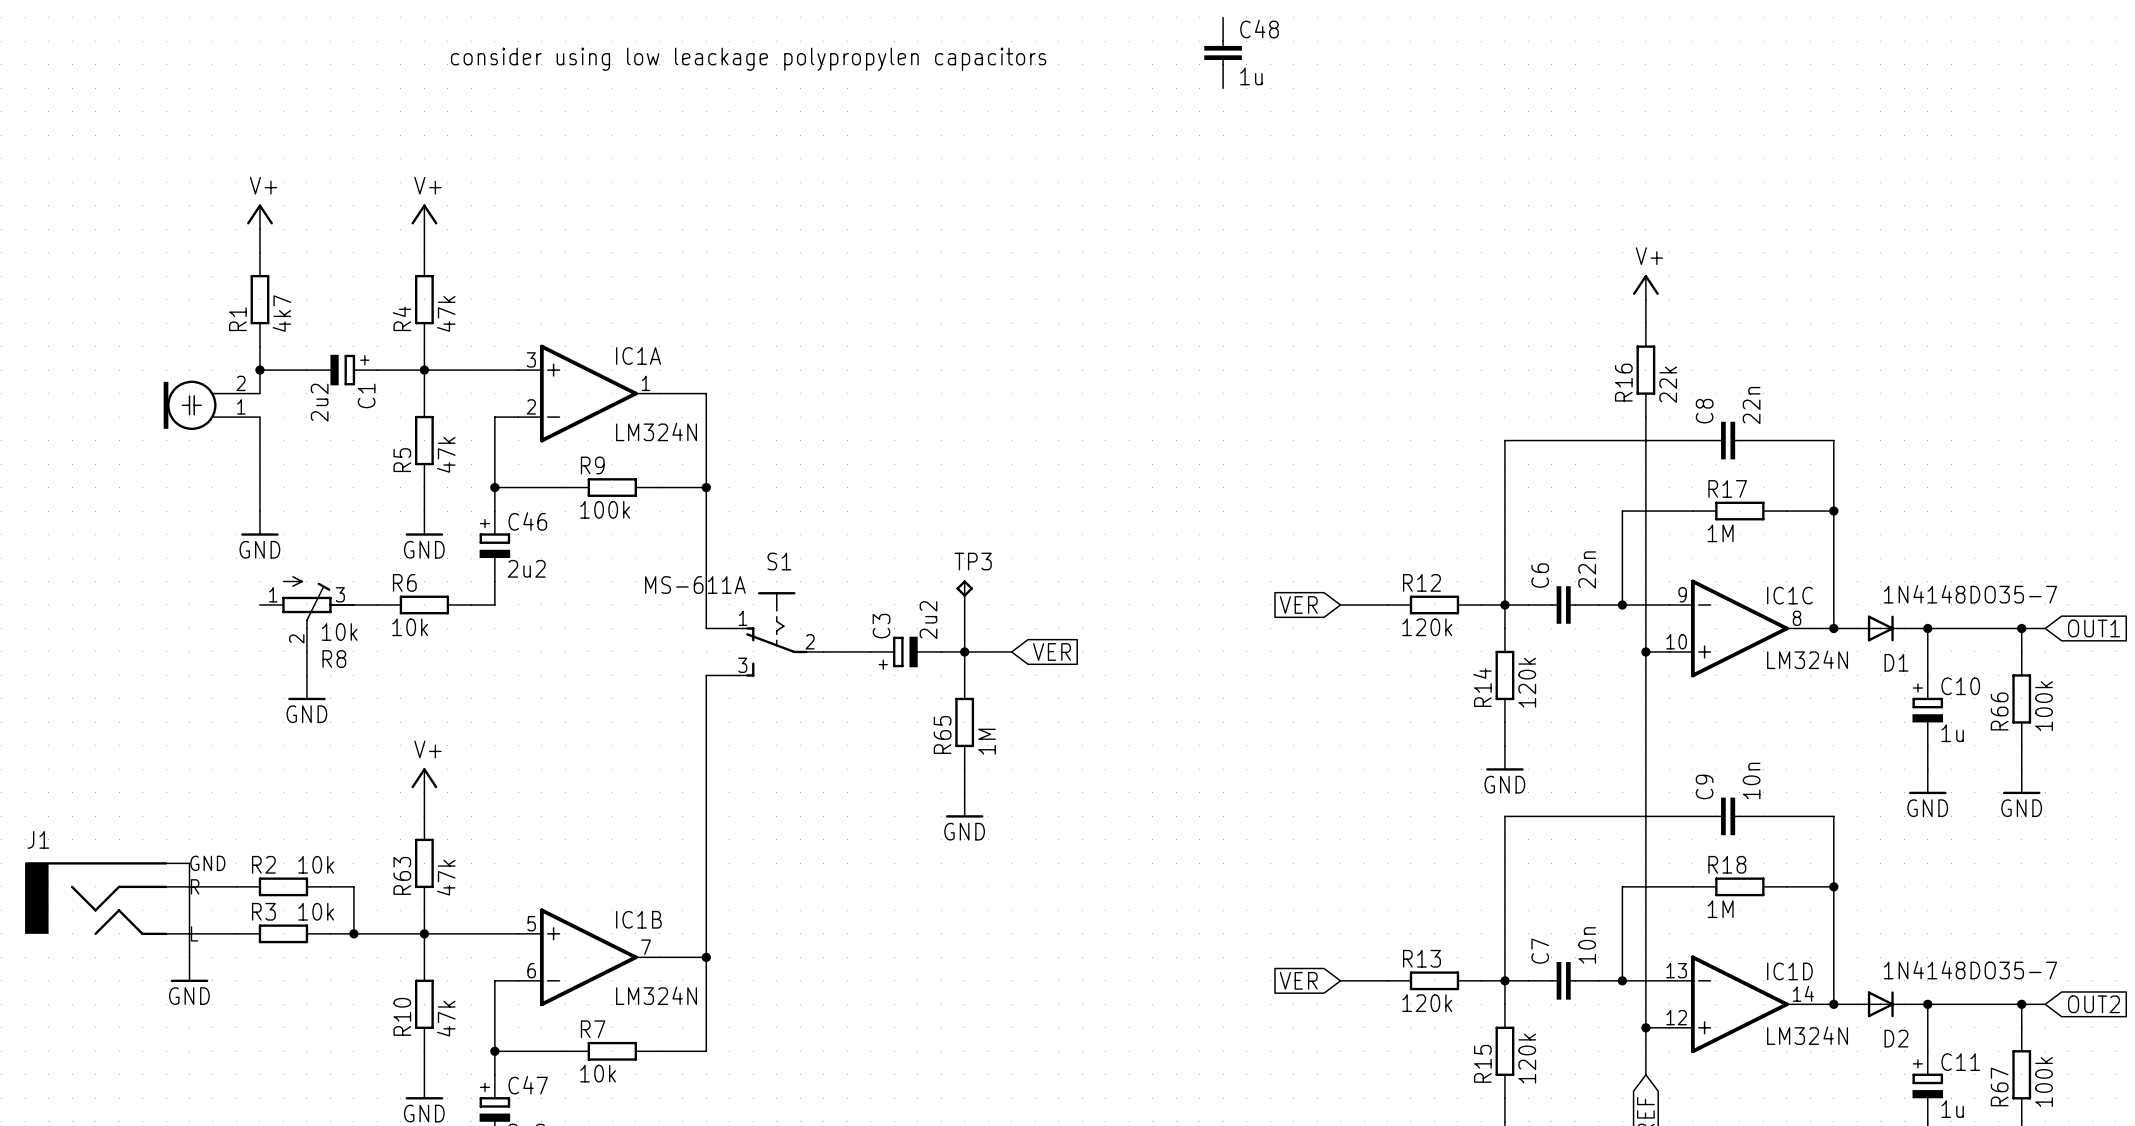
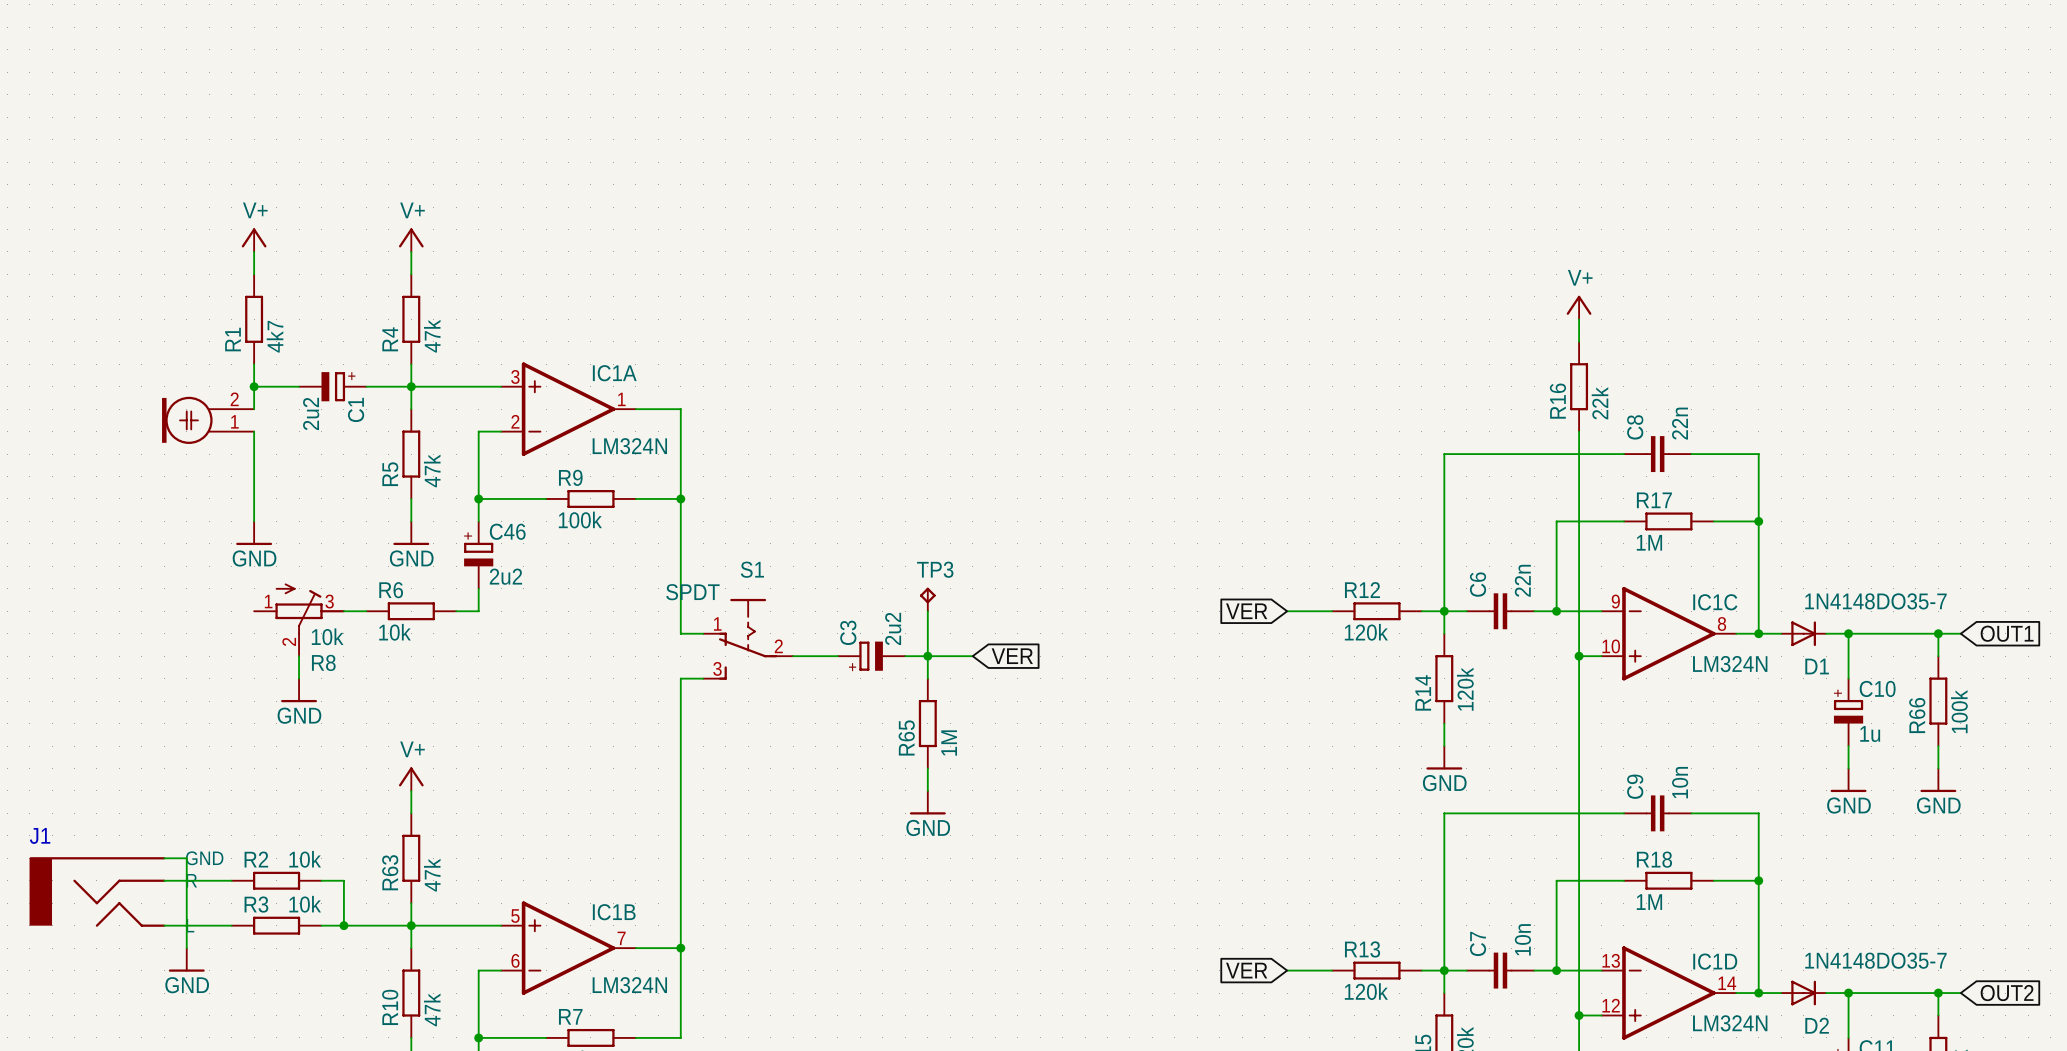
C48: 1u (1223, 52) -> none
text: consider using low leackage polypropylen capacitors (748, 59) -> none
S1 value: MS-611A (695, 585) -> SPDT (692, 592)

